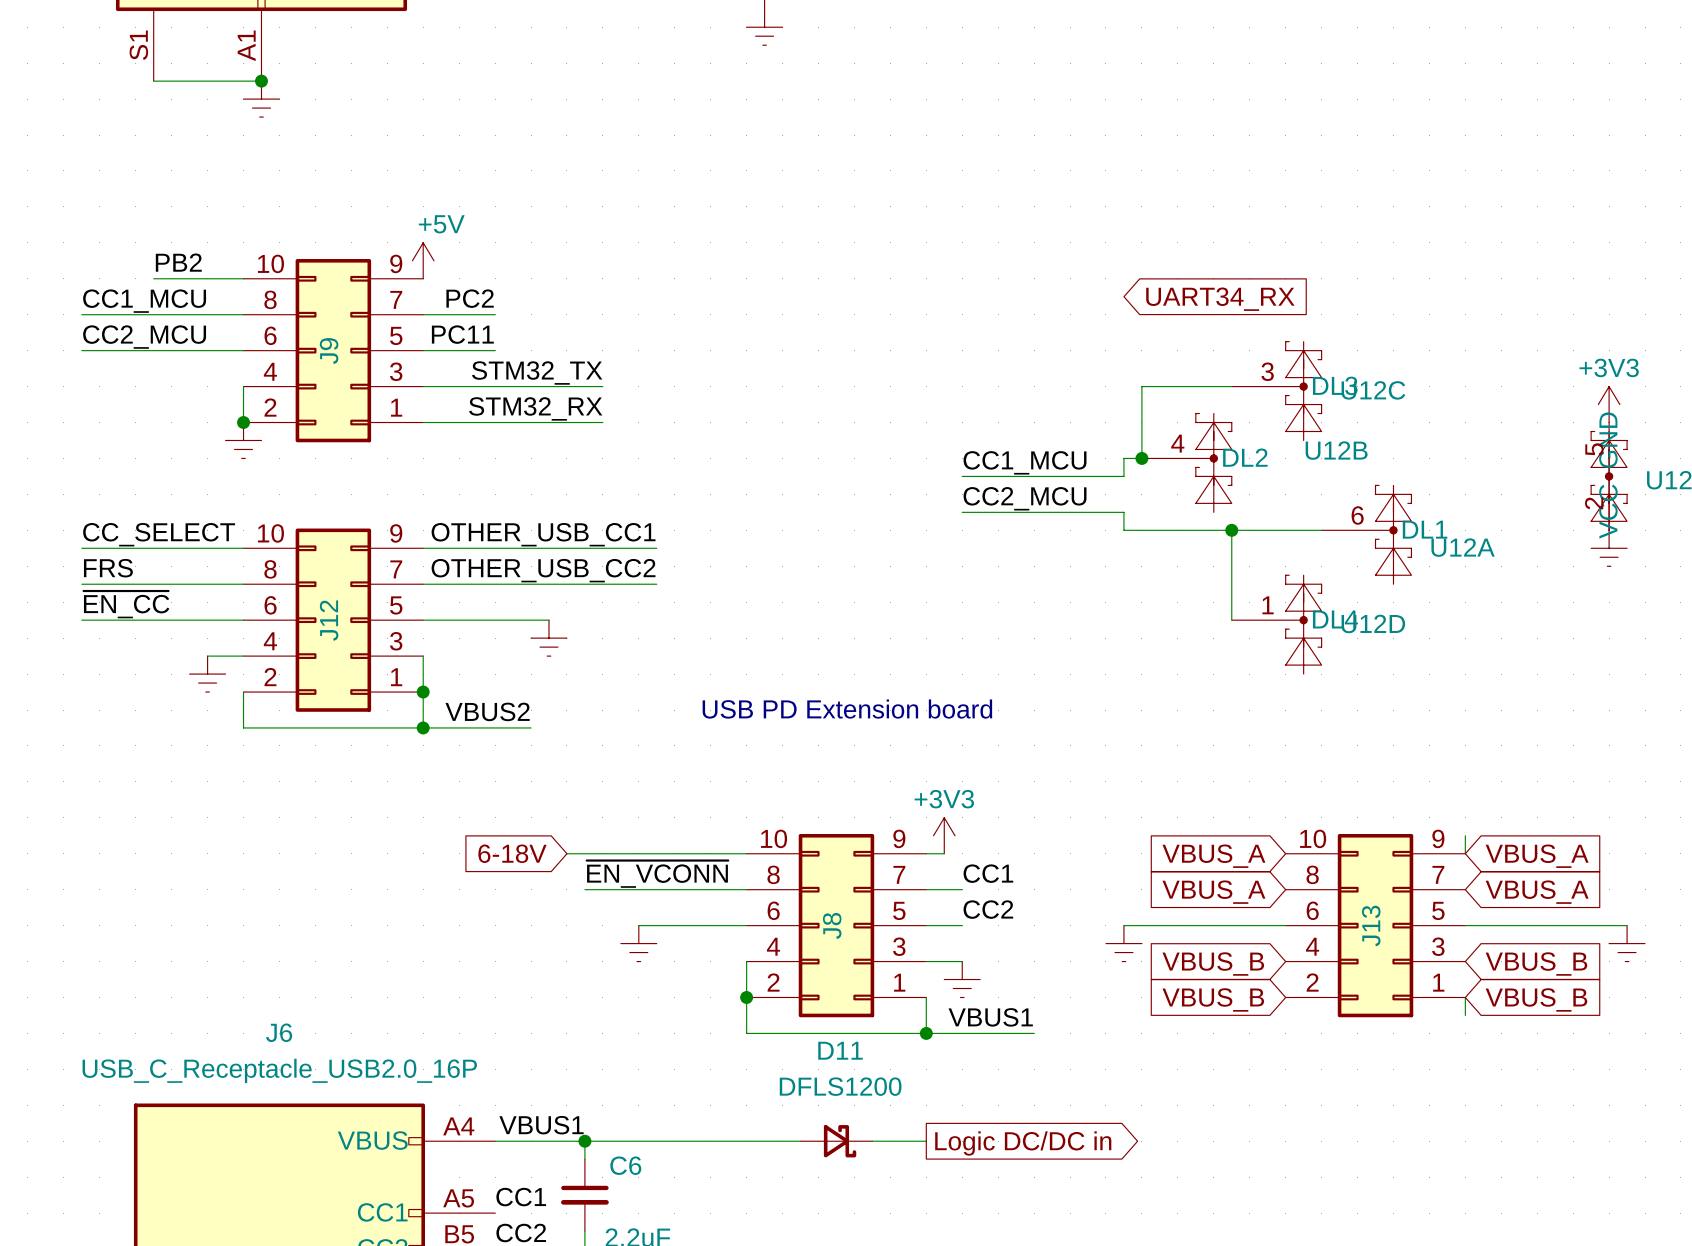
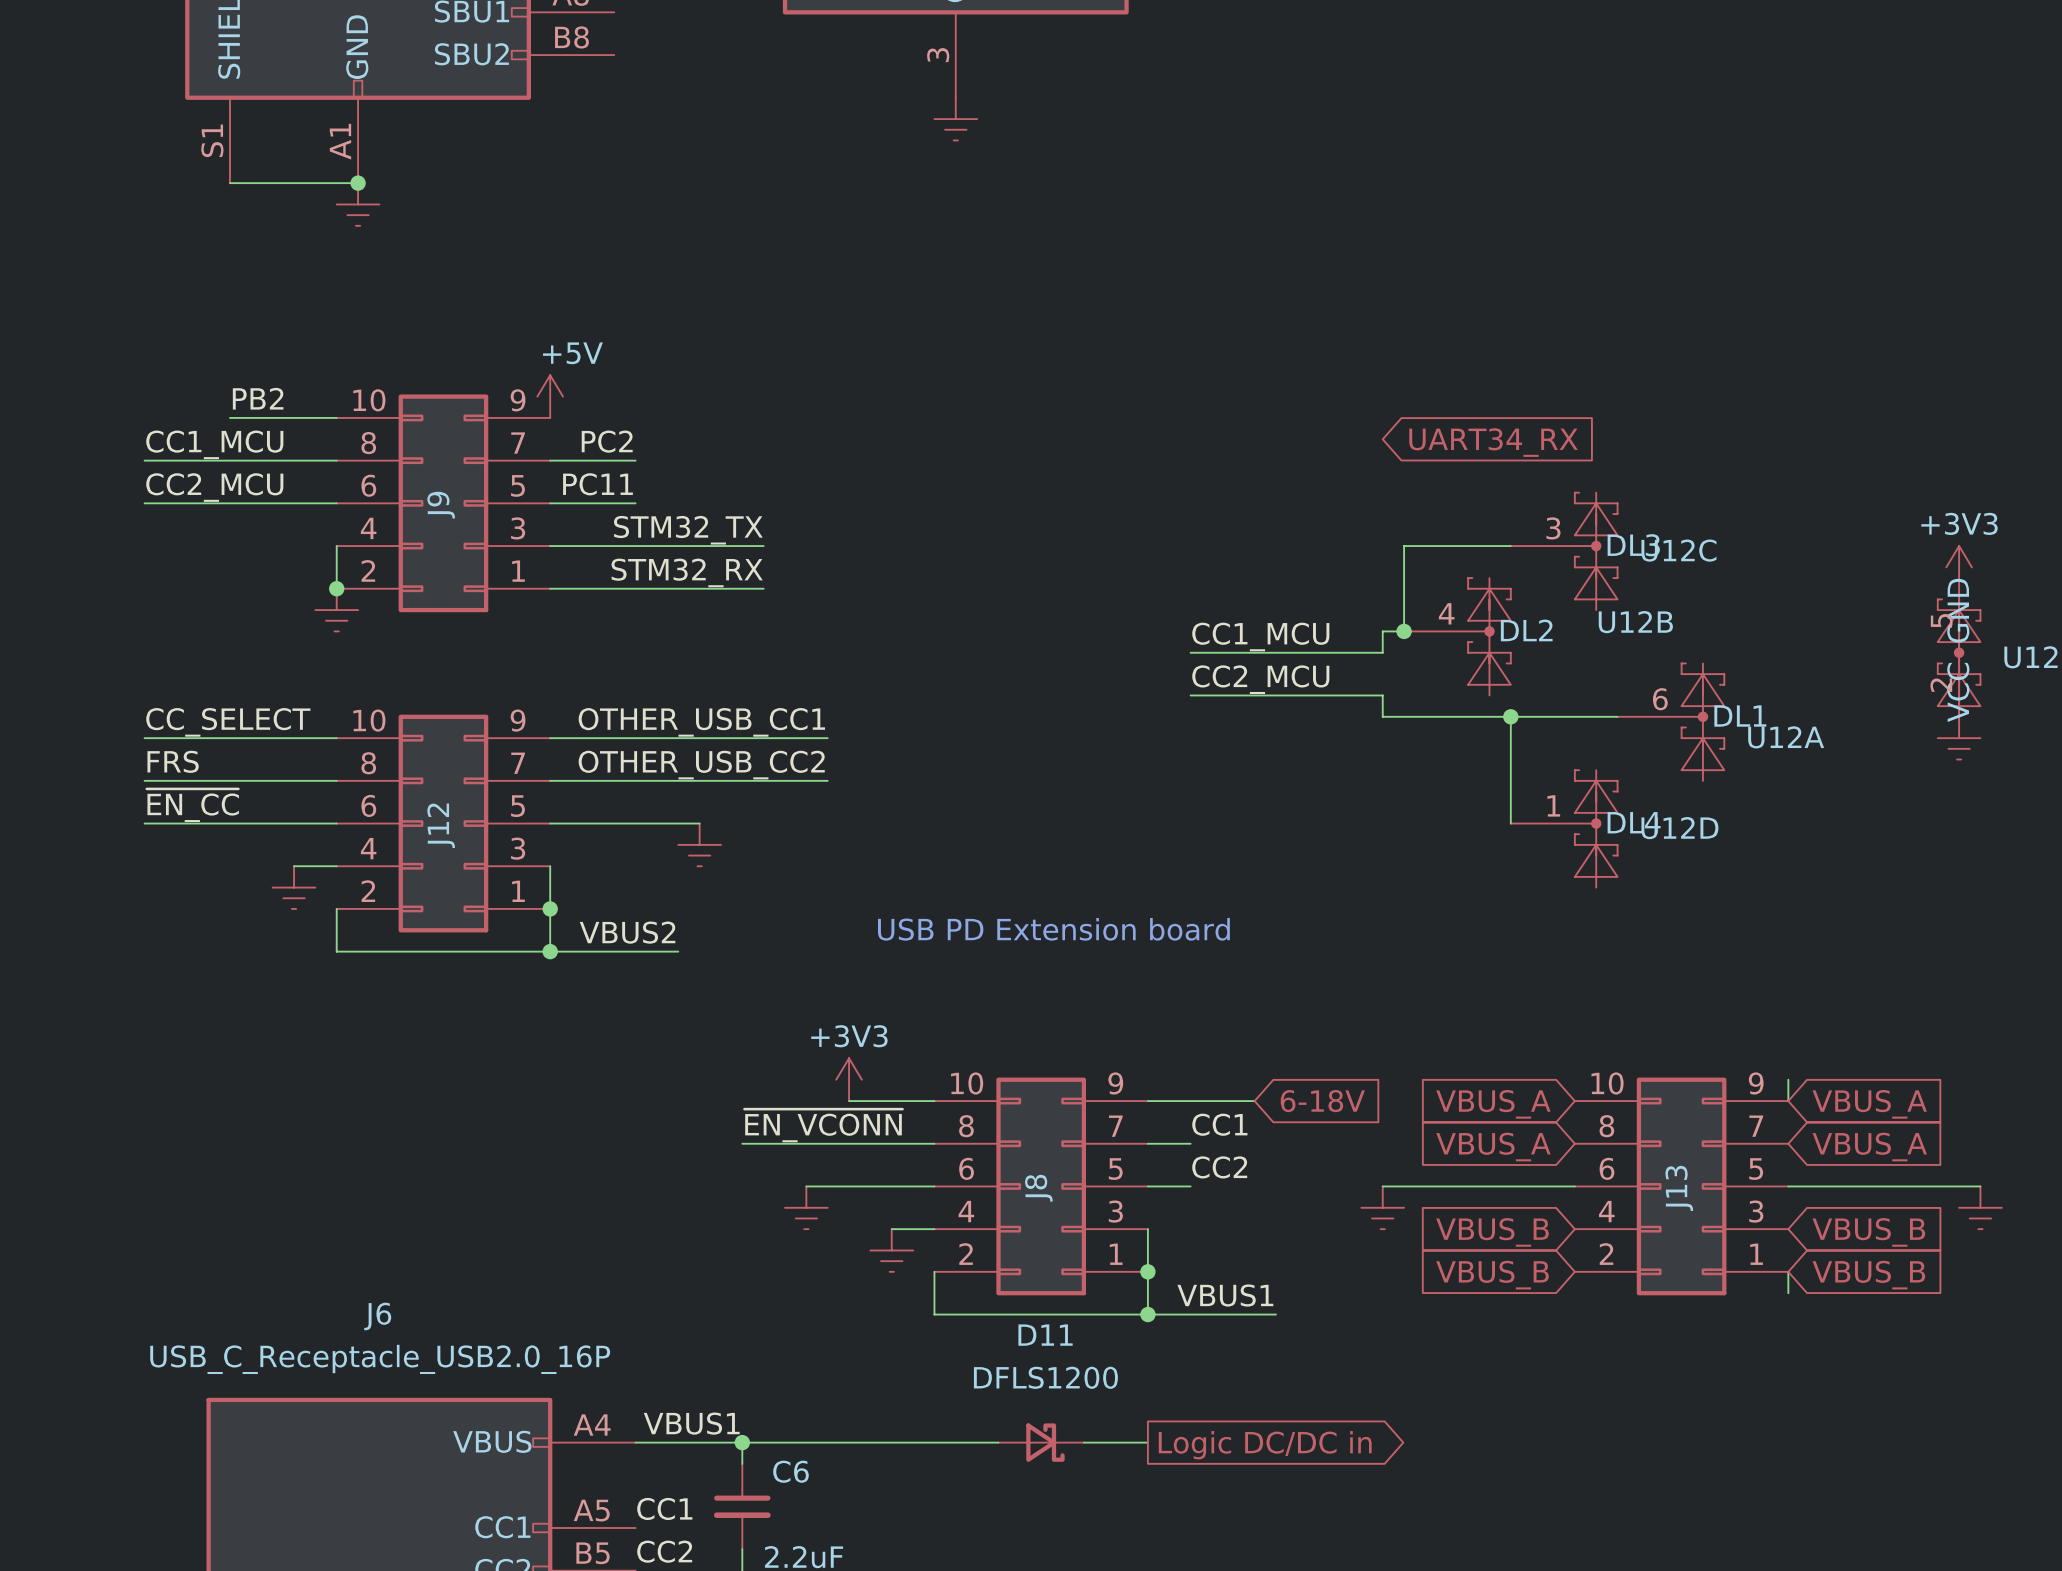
power symbol position: +3V3 (944, 835) -> +3V3 (849, 1079)
global label: 6-18V (512, 853) -> none
wire: (566, 853) (674, 853) -> none
wire: none -> (1169, 1101) (1254, 1101)
global label: none -> 6-18V (1322, 1101)
wire: (746, 961) (746, 997) -> (934, 1229) (891, 1229)
wire: (926, 961) (962, 961) -> (1147, 1229) (1147, 1271)
power symbol position: (962, 979) -> (891, 1250)
junction: (746, 997) -> none
junction: none -> (1147, 1271)

